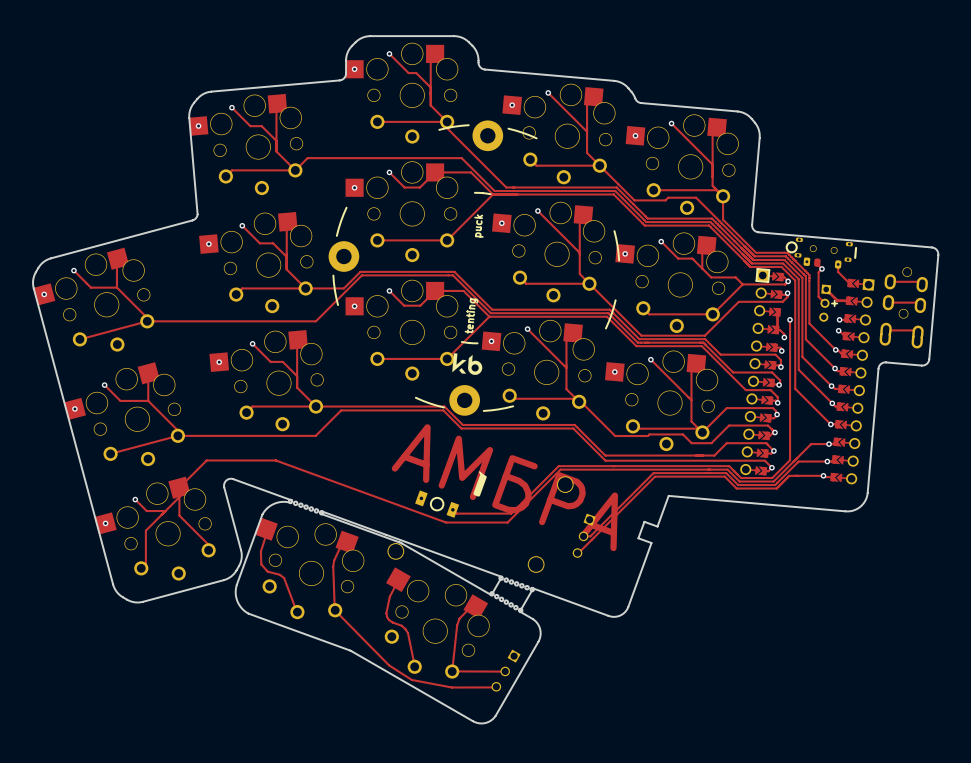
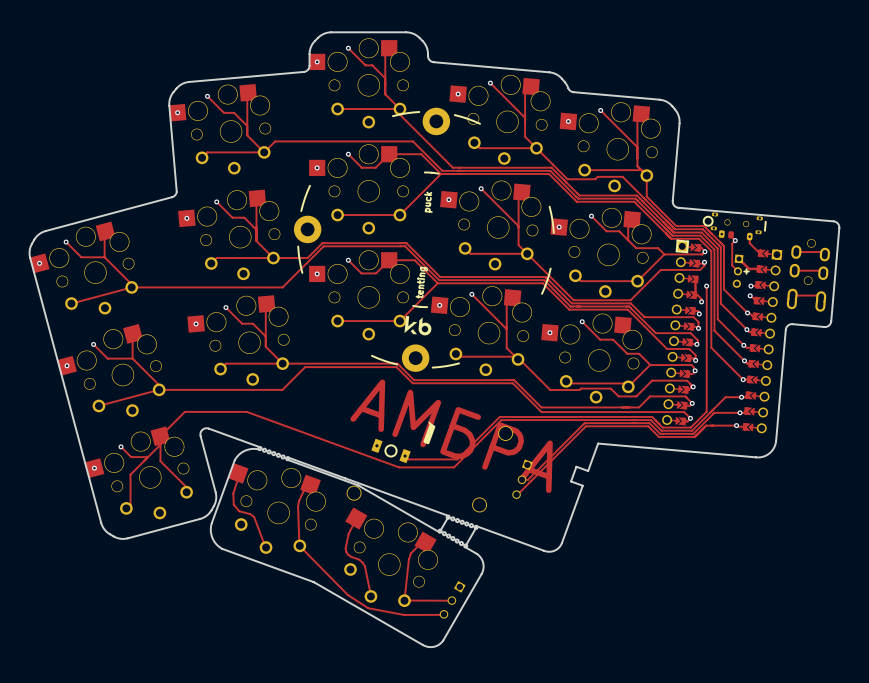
track: (691, 368) (691, 421) (698, 428) -> none
track: (670, 379) (688, 397) -> (600, 339) (613, 339) (627, 353) (639, 353) (650, 365)
track: (688, 397) (691, 400) -> none

